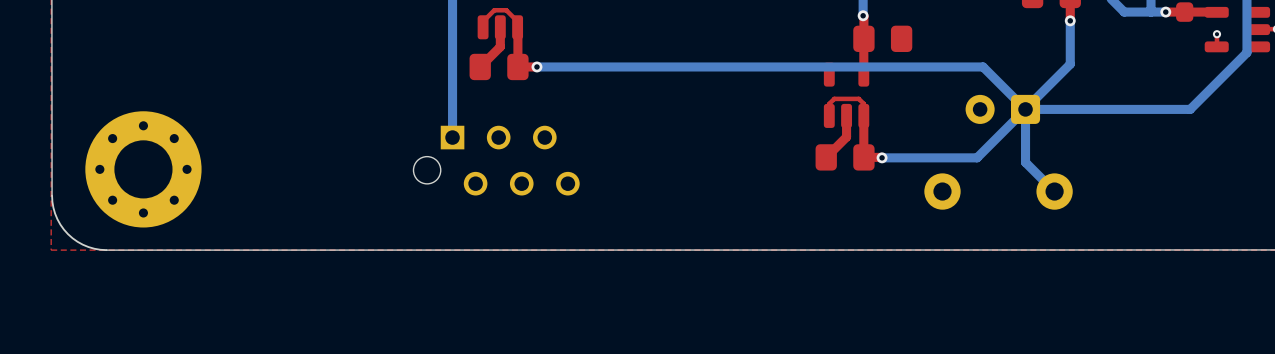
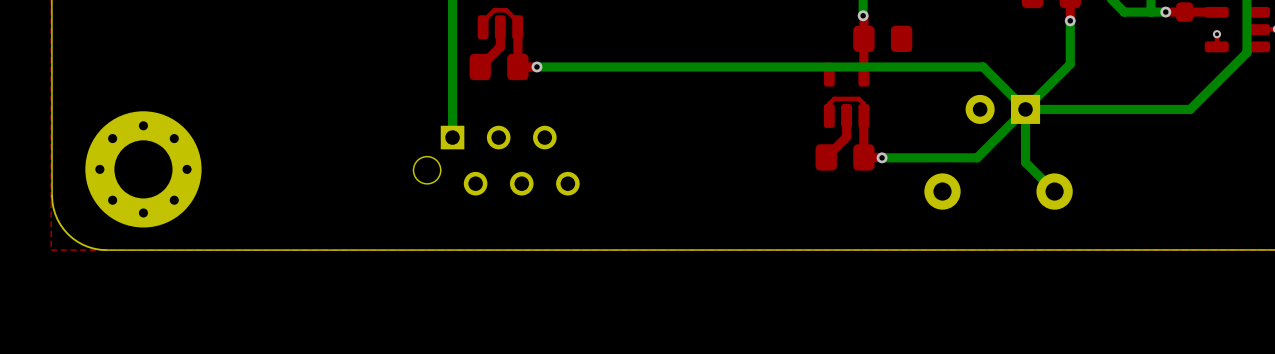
part footprint: [965, 94, 1041, 124] -> [965, 94, 1041, 124]

